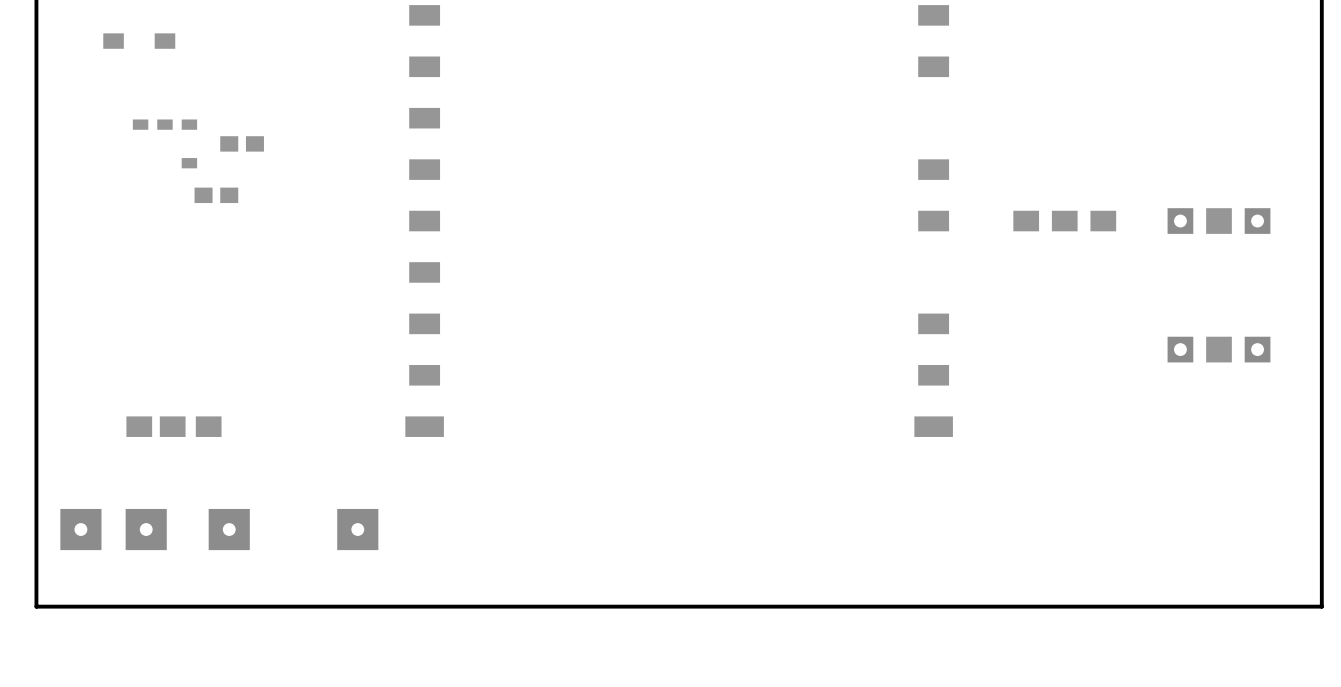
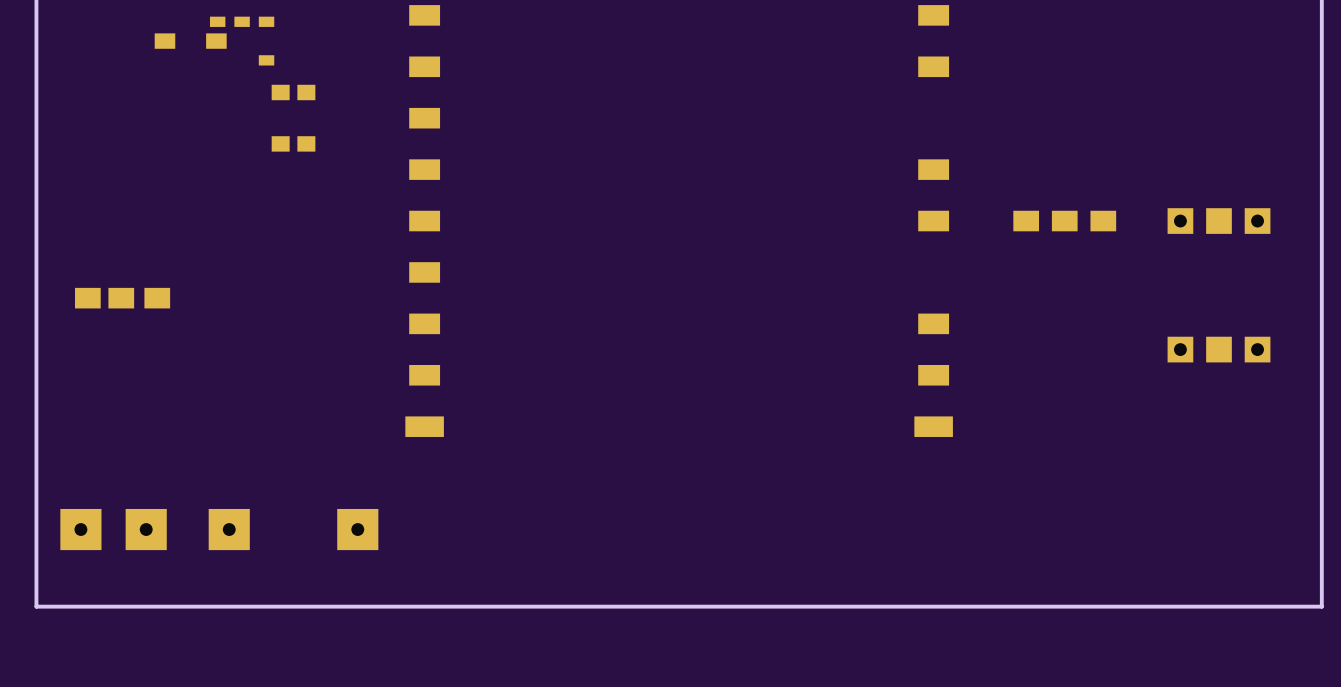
part position: (139, 41) -> (190, 41)
part: none -> (293, 92)
part position: (164, 143) -> (242, 41)
part: (242, 143) -> none
part: none -> (293, 143)
part: (216, 195) -> none
part position: (173, 426) -> (122, 298)

